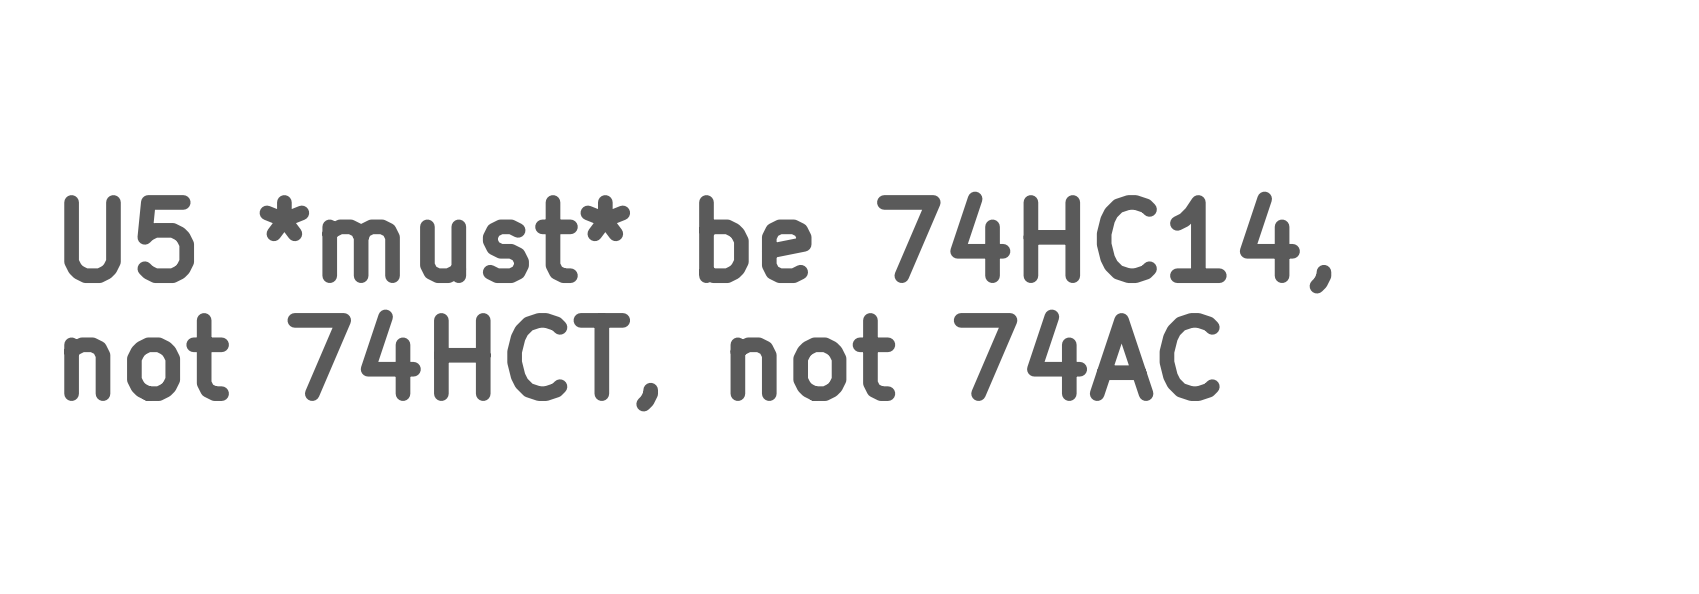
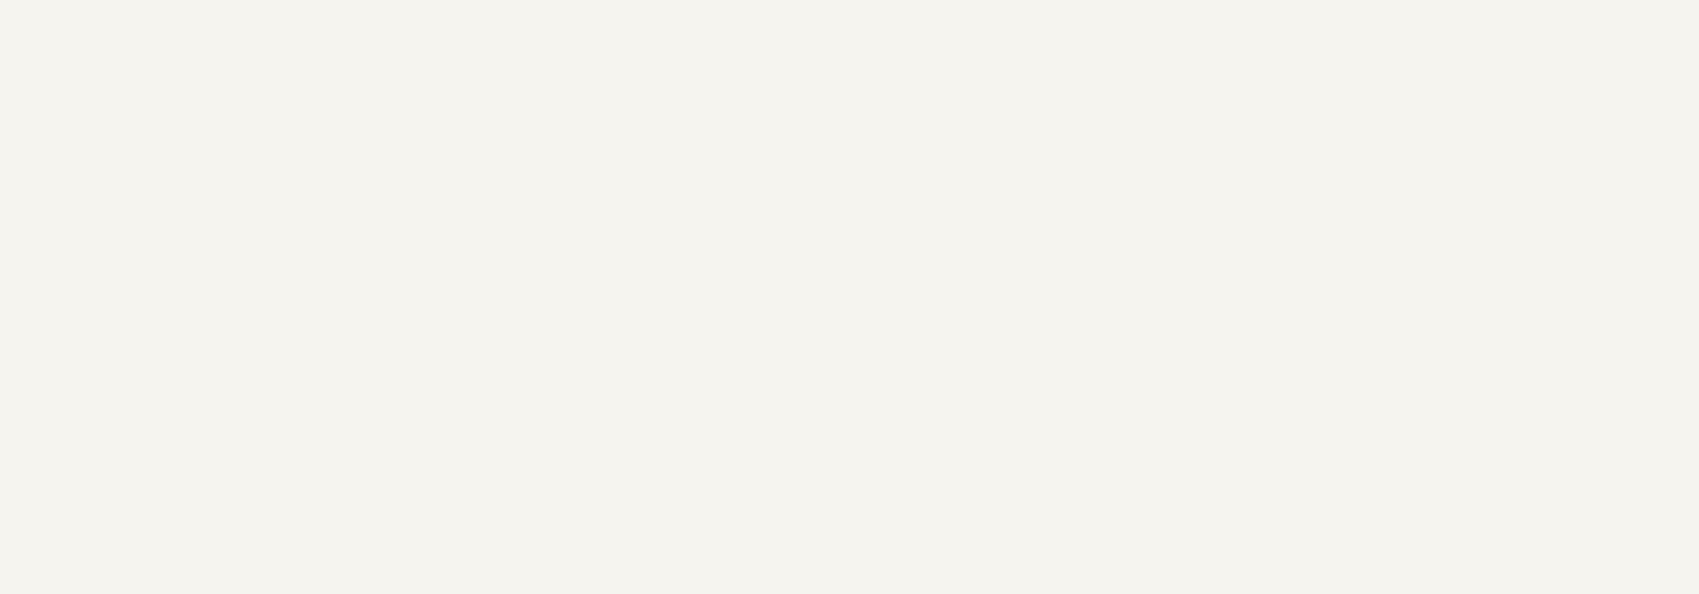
text: U5 *must* be 74HC14, (697, 242) -> none
text: not 74HCT, not 74AC (641, 360) -> none

